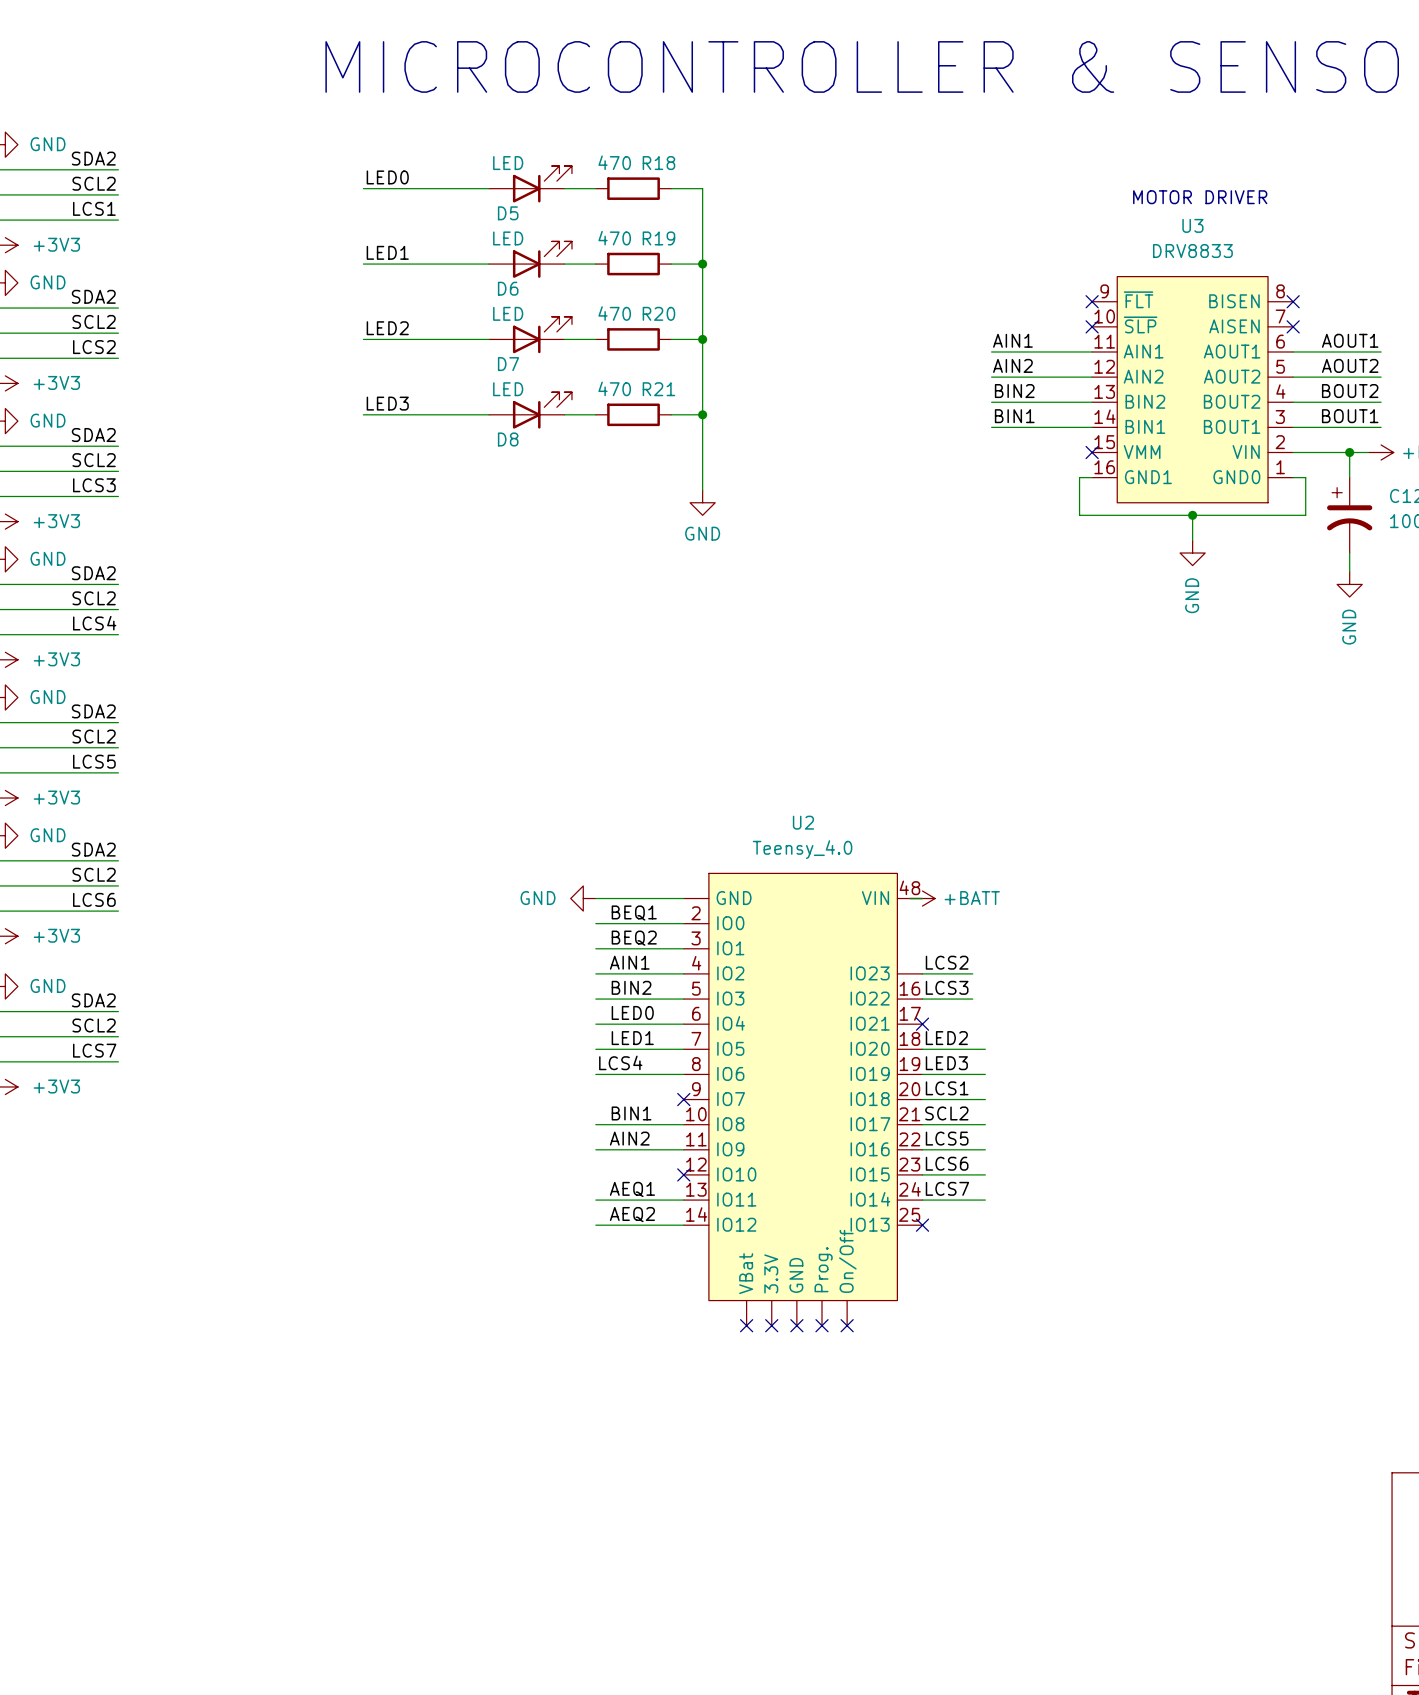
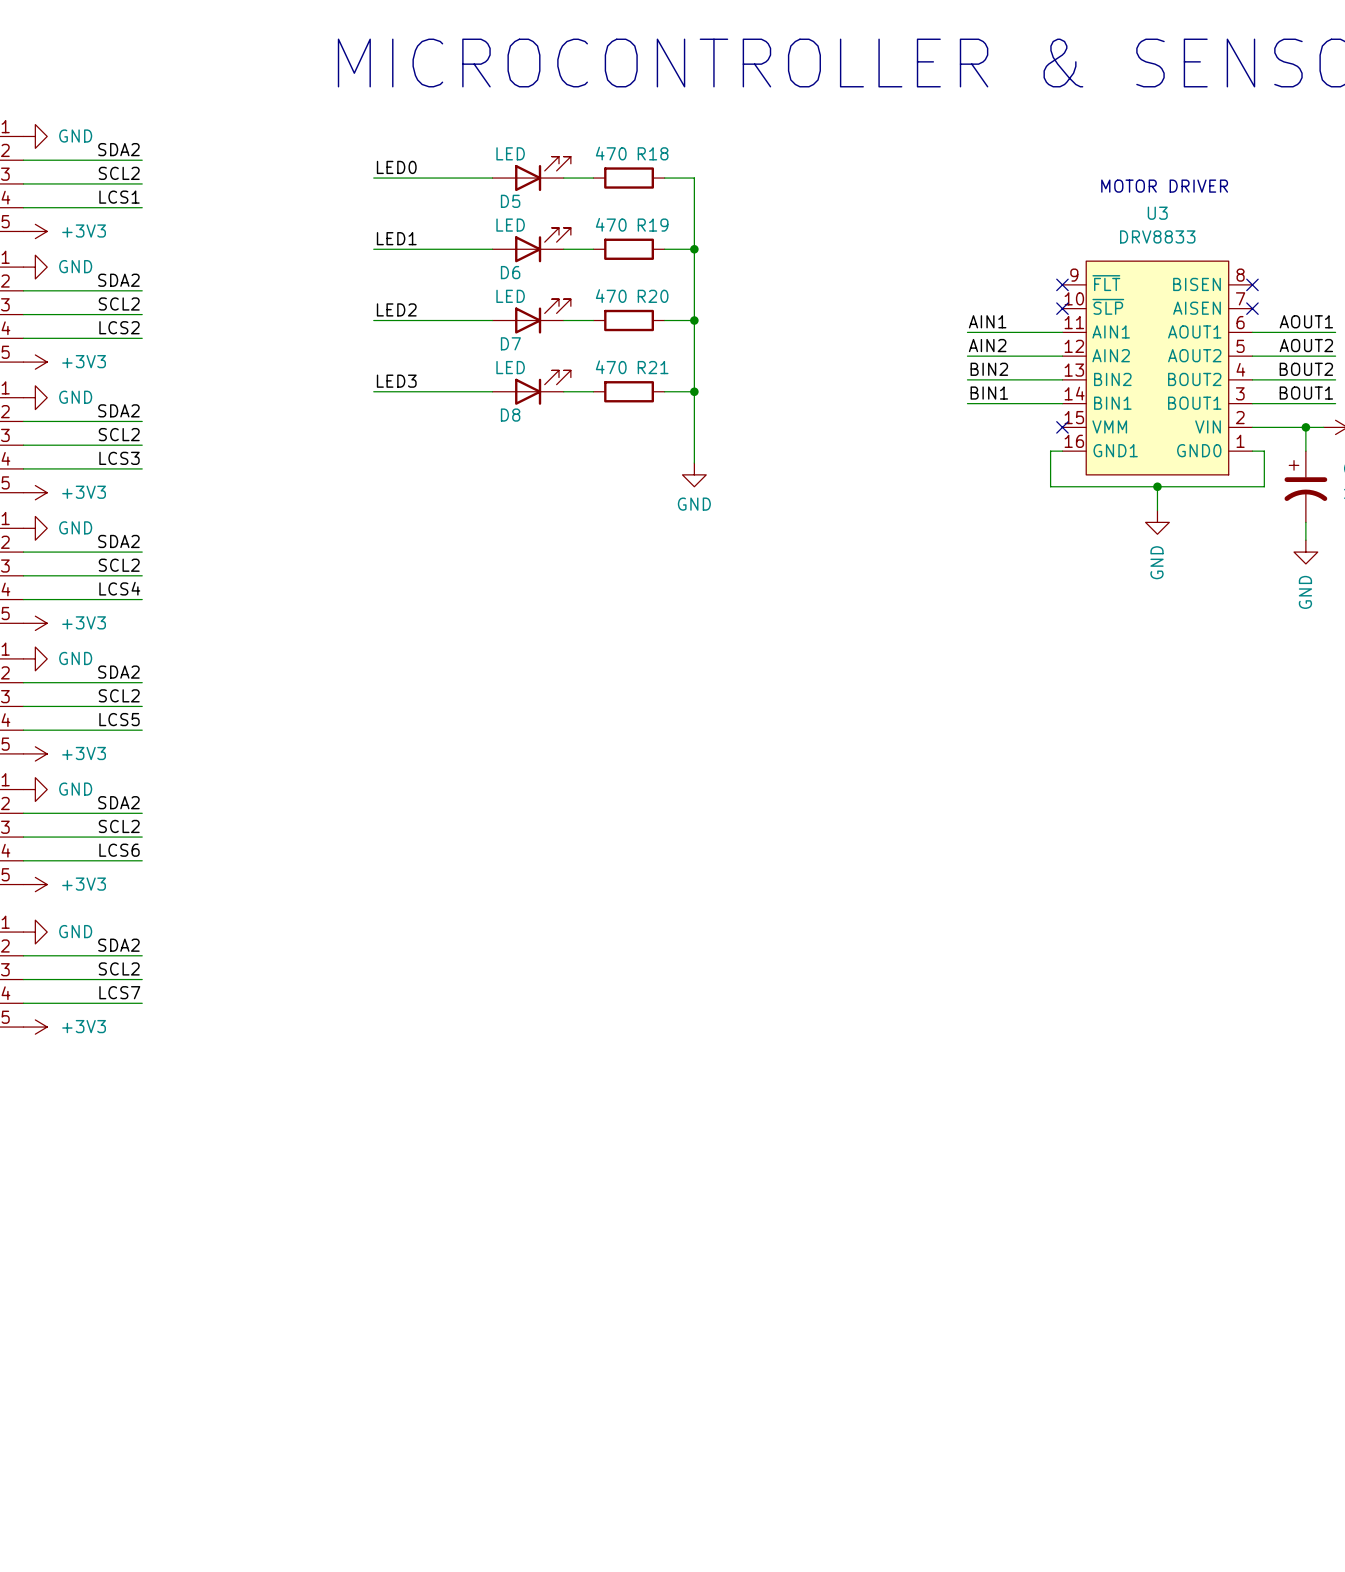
power symbol: GND (583, 898) -> none
wire: (595, 898) (683, 898) -> none
wire: (909, 898) (922, 898) -> none
power symbol: +BATT (922, 898) -> none
label: BEQ1 (634, 913) -> none
wire: (595, 923) (683, 923) -> none
label: BEQ2 (634, 938) -> none
wire: (595, 948) (683, 948) -> none
label: AIN1 (629, 962) -> none
label: LCS2 (947, 962) -> none
wire: (595, 973) (683, 973) -> none
wire: (922, 973) (972, 973) -> none
label: BIN2 (631, 987) -> none
label: LCS3 (947, 987) -> none
wire: (595, 999) (683, 999) -> none
wire: (922, 999) (972, 999) -> none
label: LED0 (632, 1012) -> none
wire: (595, 1024) (683, 1024) -> none
no-connect mark: (922, 1024) -> none
label: LED1 (632, 1038) -> none
label: LED2 (946, 1038) -> none
wire: (595, 1049) (683, 1049) -> none
wire: (922, 1049) (985, 1049) -> none
label: LCS4 (620, 1062) -> none
label: LED3 (946, 1063) -> none
wire: (595, 1074) (683, 1074) -> none
wire: (922, 1074) (985, 1074) -> none
label: LCS1 (947, 1088) -> none
no-connect mark: (683, 1099) -> none
U2: Teensy_4.0 (803, 1099) -> none
wire: (922, 1099) (985, 1099) -> none
label: BIN1 (631, 1113) -> none
label: SCL2 (946, 1113) -> none
wire: (595, 1124) (683, 1124) -> none
wire: (922, 1124) (985, 1124) -> none
label: AIN2 (629, 1138) -> none
label: LCS5 (947, 1138) -> none
wire: (595, 1149) (683, 1149) -> none
wire: (922, 1149) (985, 1149) -> none
label: LCS6 (947, 1163) -> none
no-connect mark: (683, 1174) -> none
wire: (922, 1174) (985, 1174) -> none
label: LCS7 (947, 1188) -> none
label: AEQ1 (632, 1189) -> none
wire: (595, 1200) (683, 1200) -> none
wire: (922, 1200) (985, 1200) -> none
label: AEQ2 (632, 1214) -> none
wire: (595, 1225) (683, 1225) -> none
no-connect mark: (922, 1225) -> none
no-connect mark: (746, 1325) -> none
no-connect mark: (771, 1325) -> none
no-connect mark: (796, 1325) -> none
no-connect mark: (821, 1325) -> none
no-connect mark: (847, 1325) -> none

